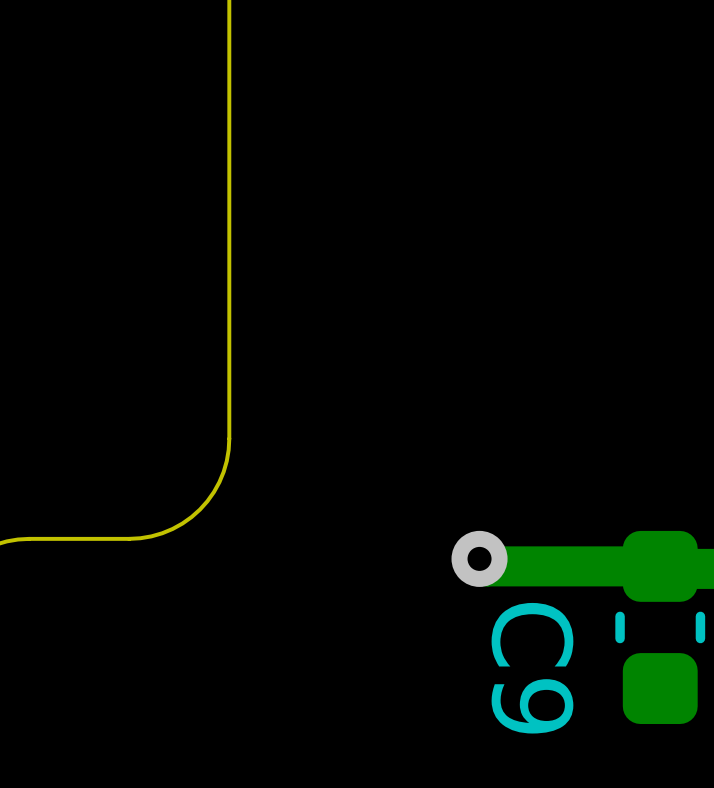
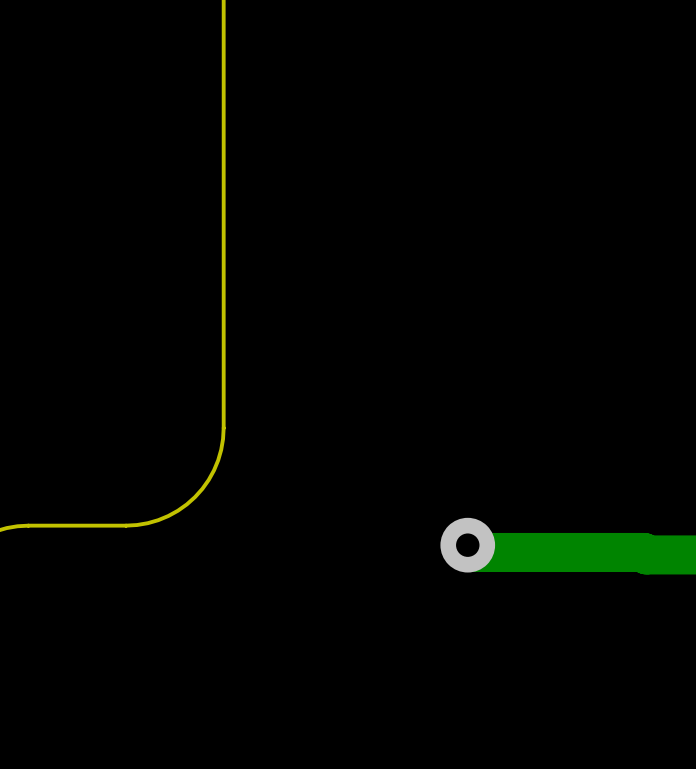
C9: (660, 627) -> none

